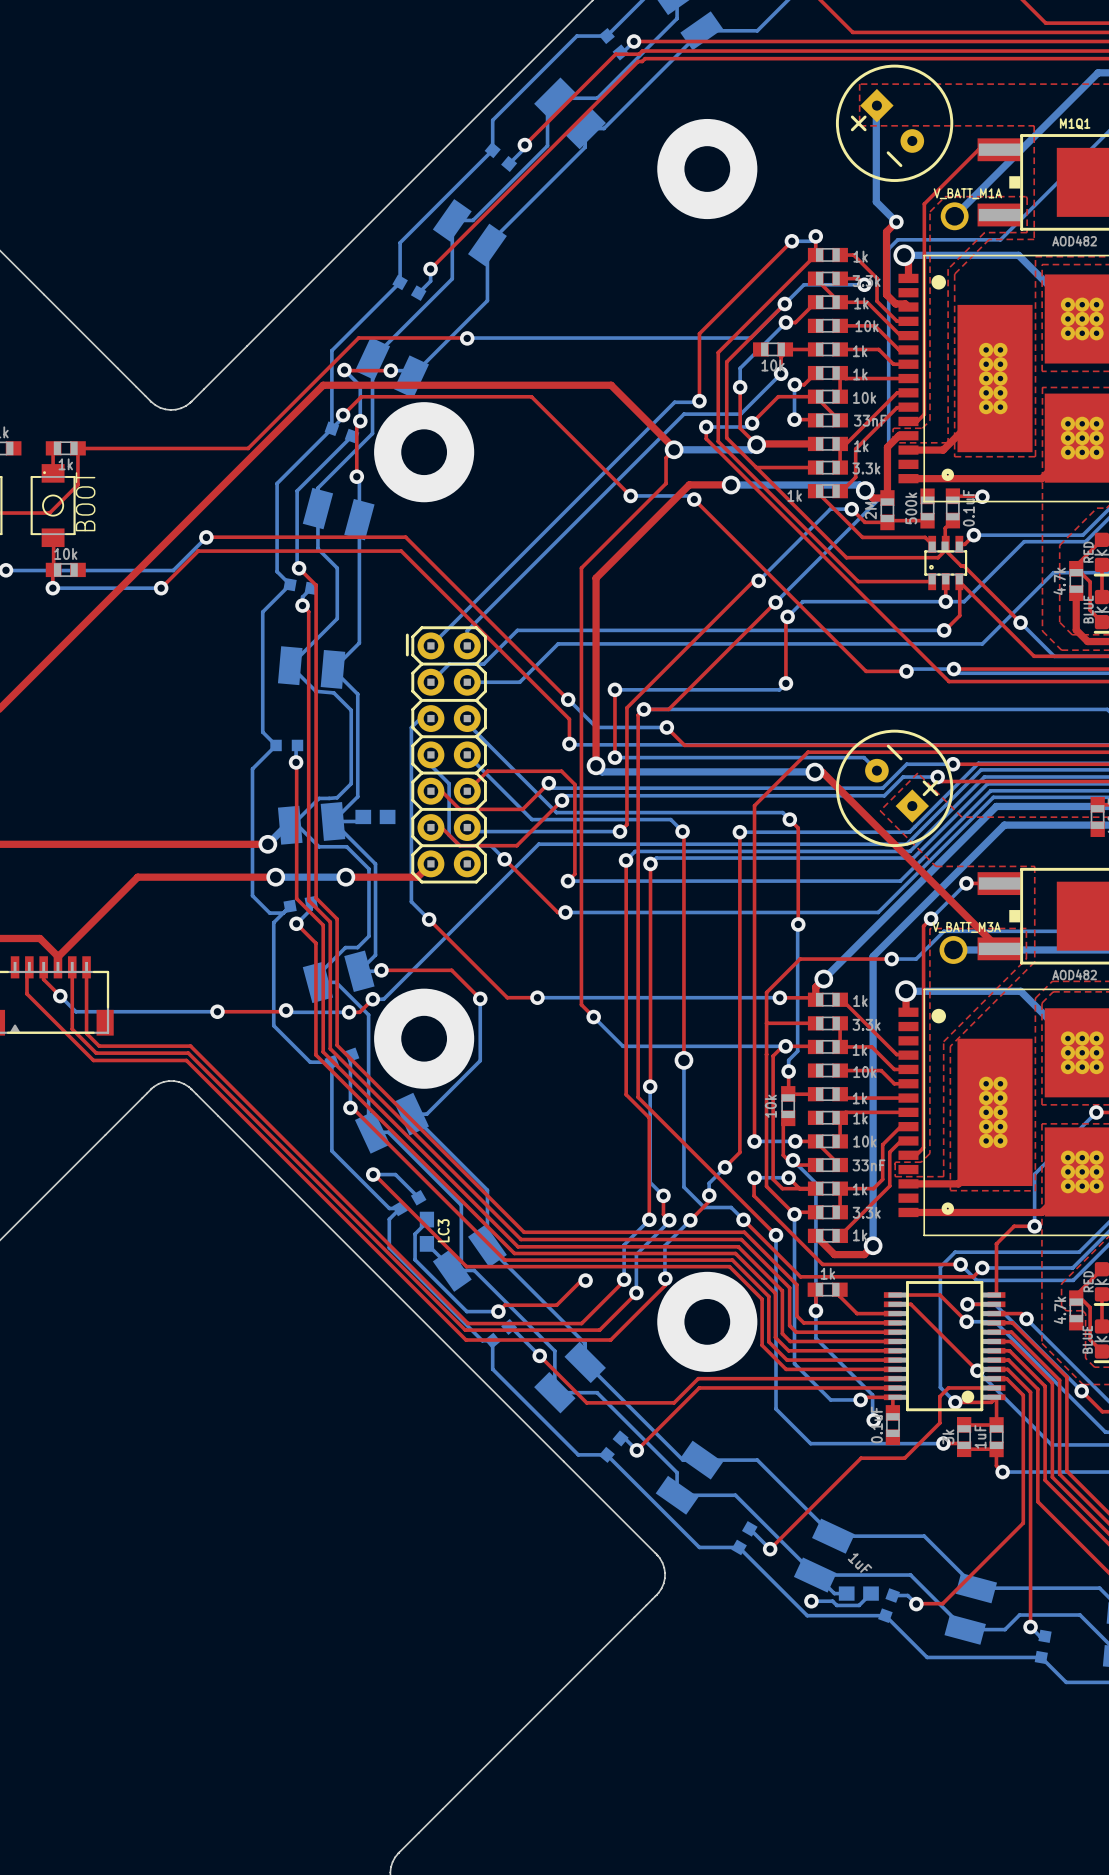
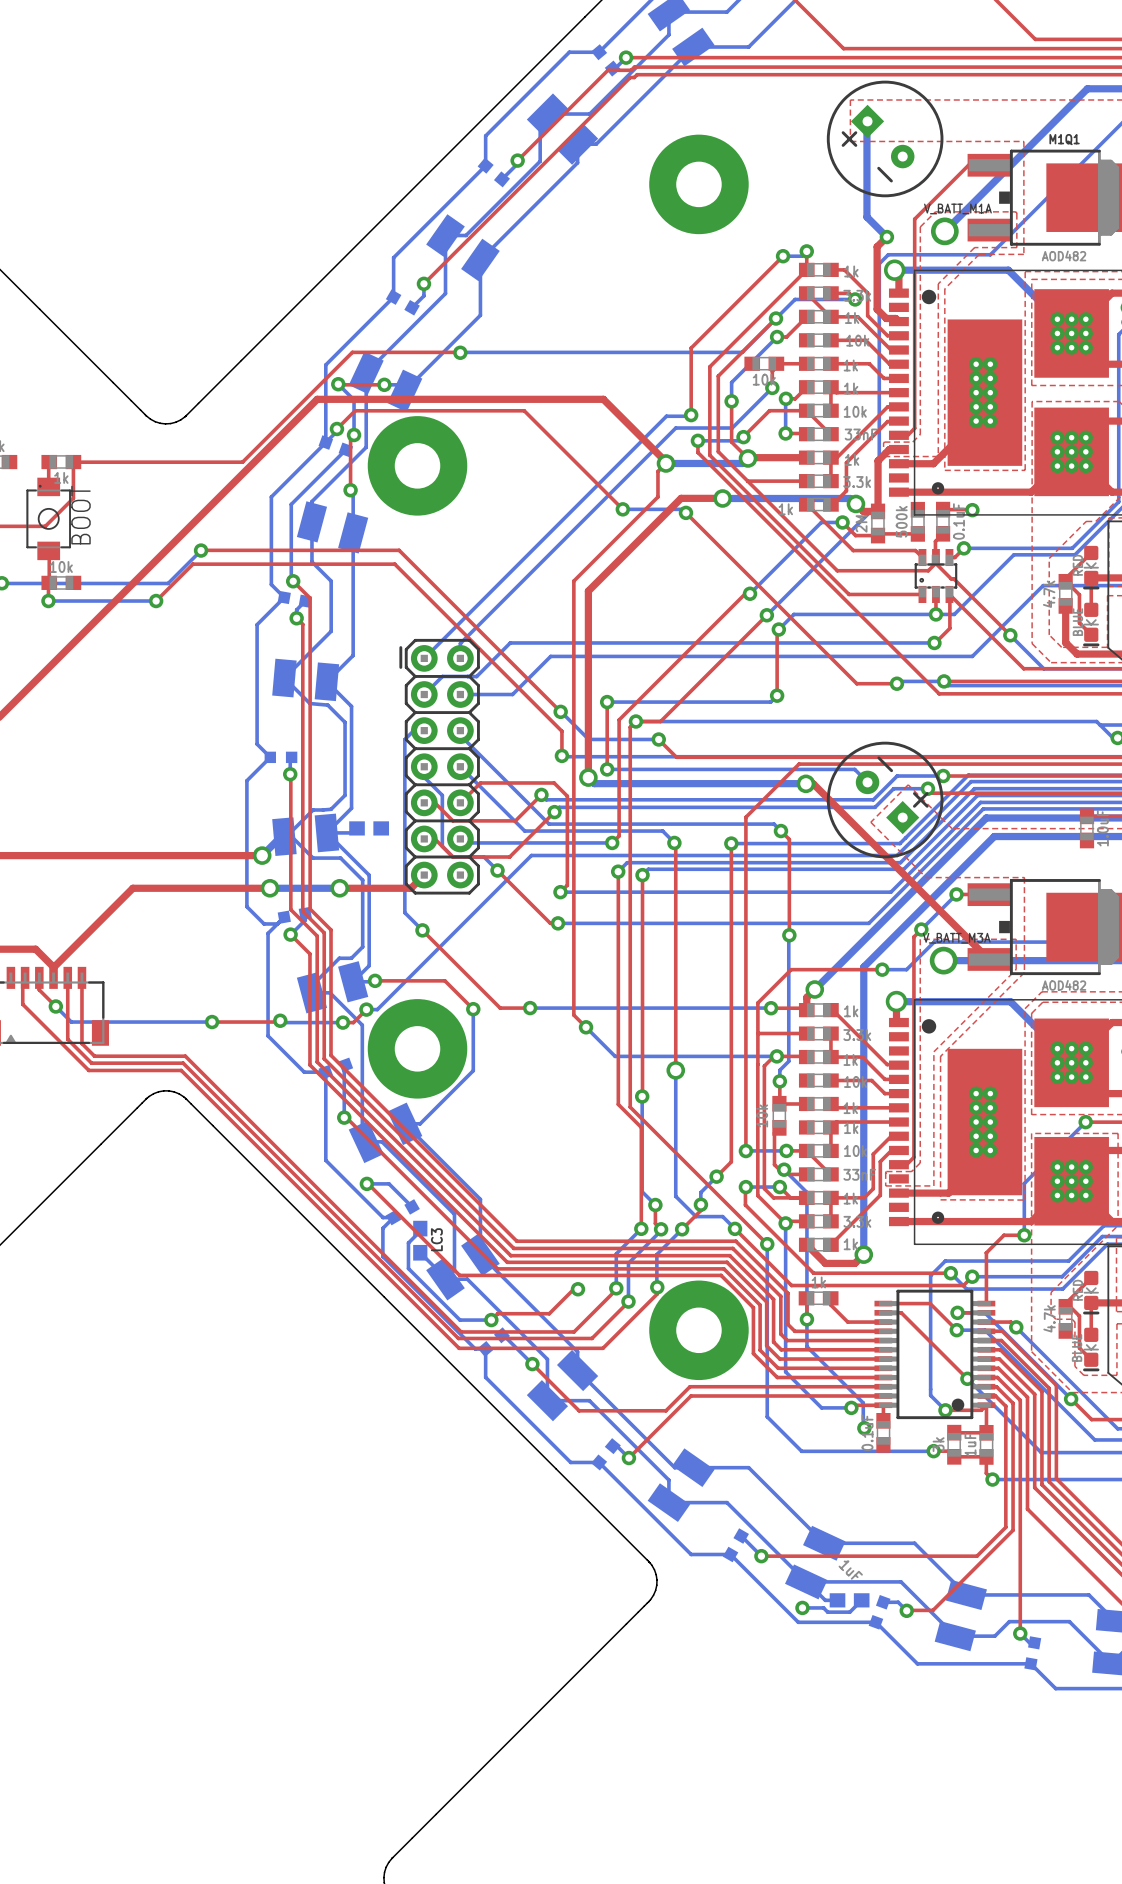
top track: (996, 1387) (948, 1387) (939, 1396) (939, 1423) (904, 1458) (861, 1458) (770, 1549) -> (986, 1395) (995, 1395) (1005, 1406) (1005, 1527) (976, 1556) (761, 1556)

